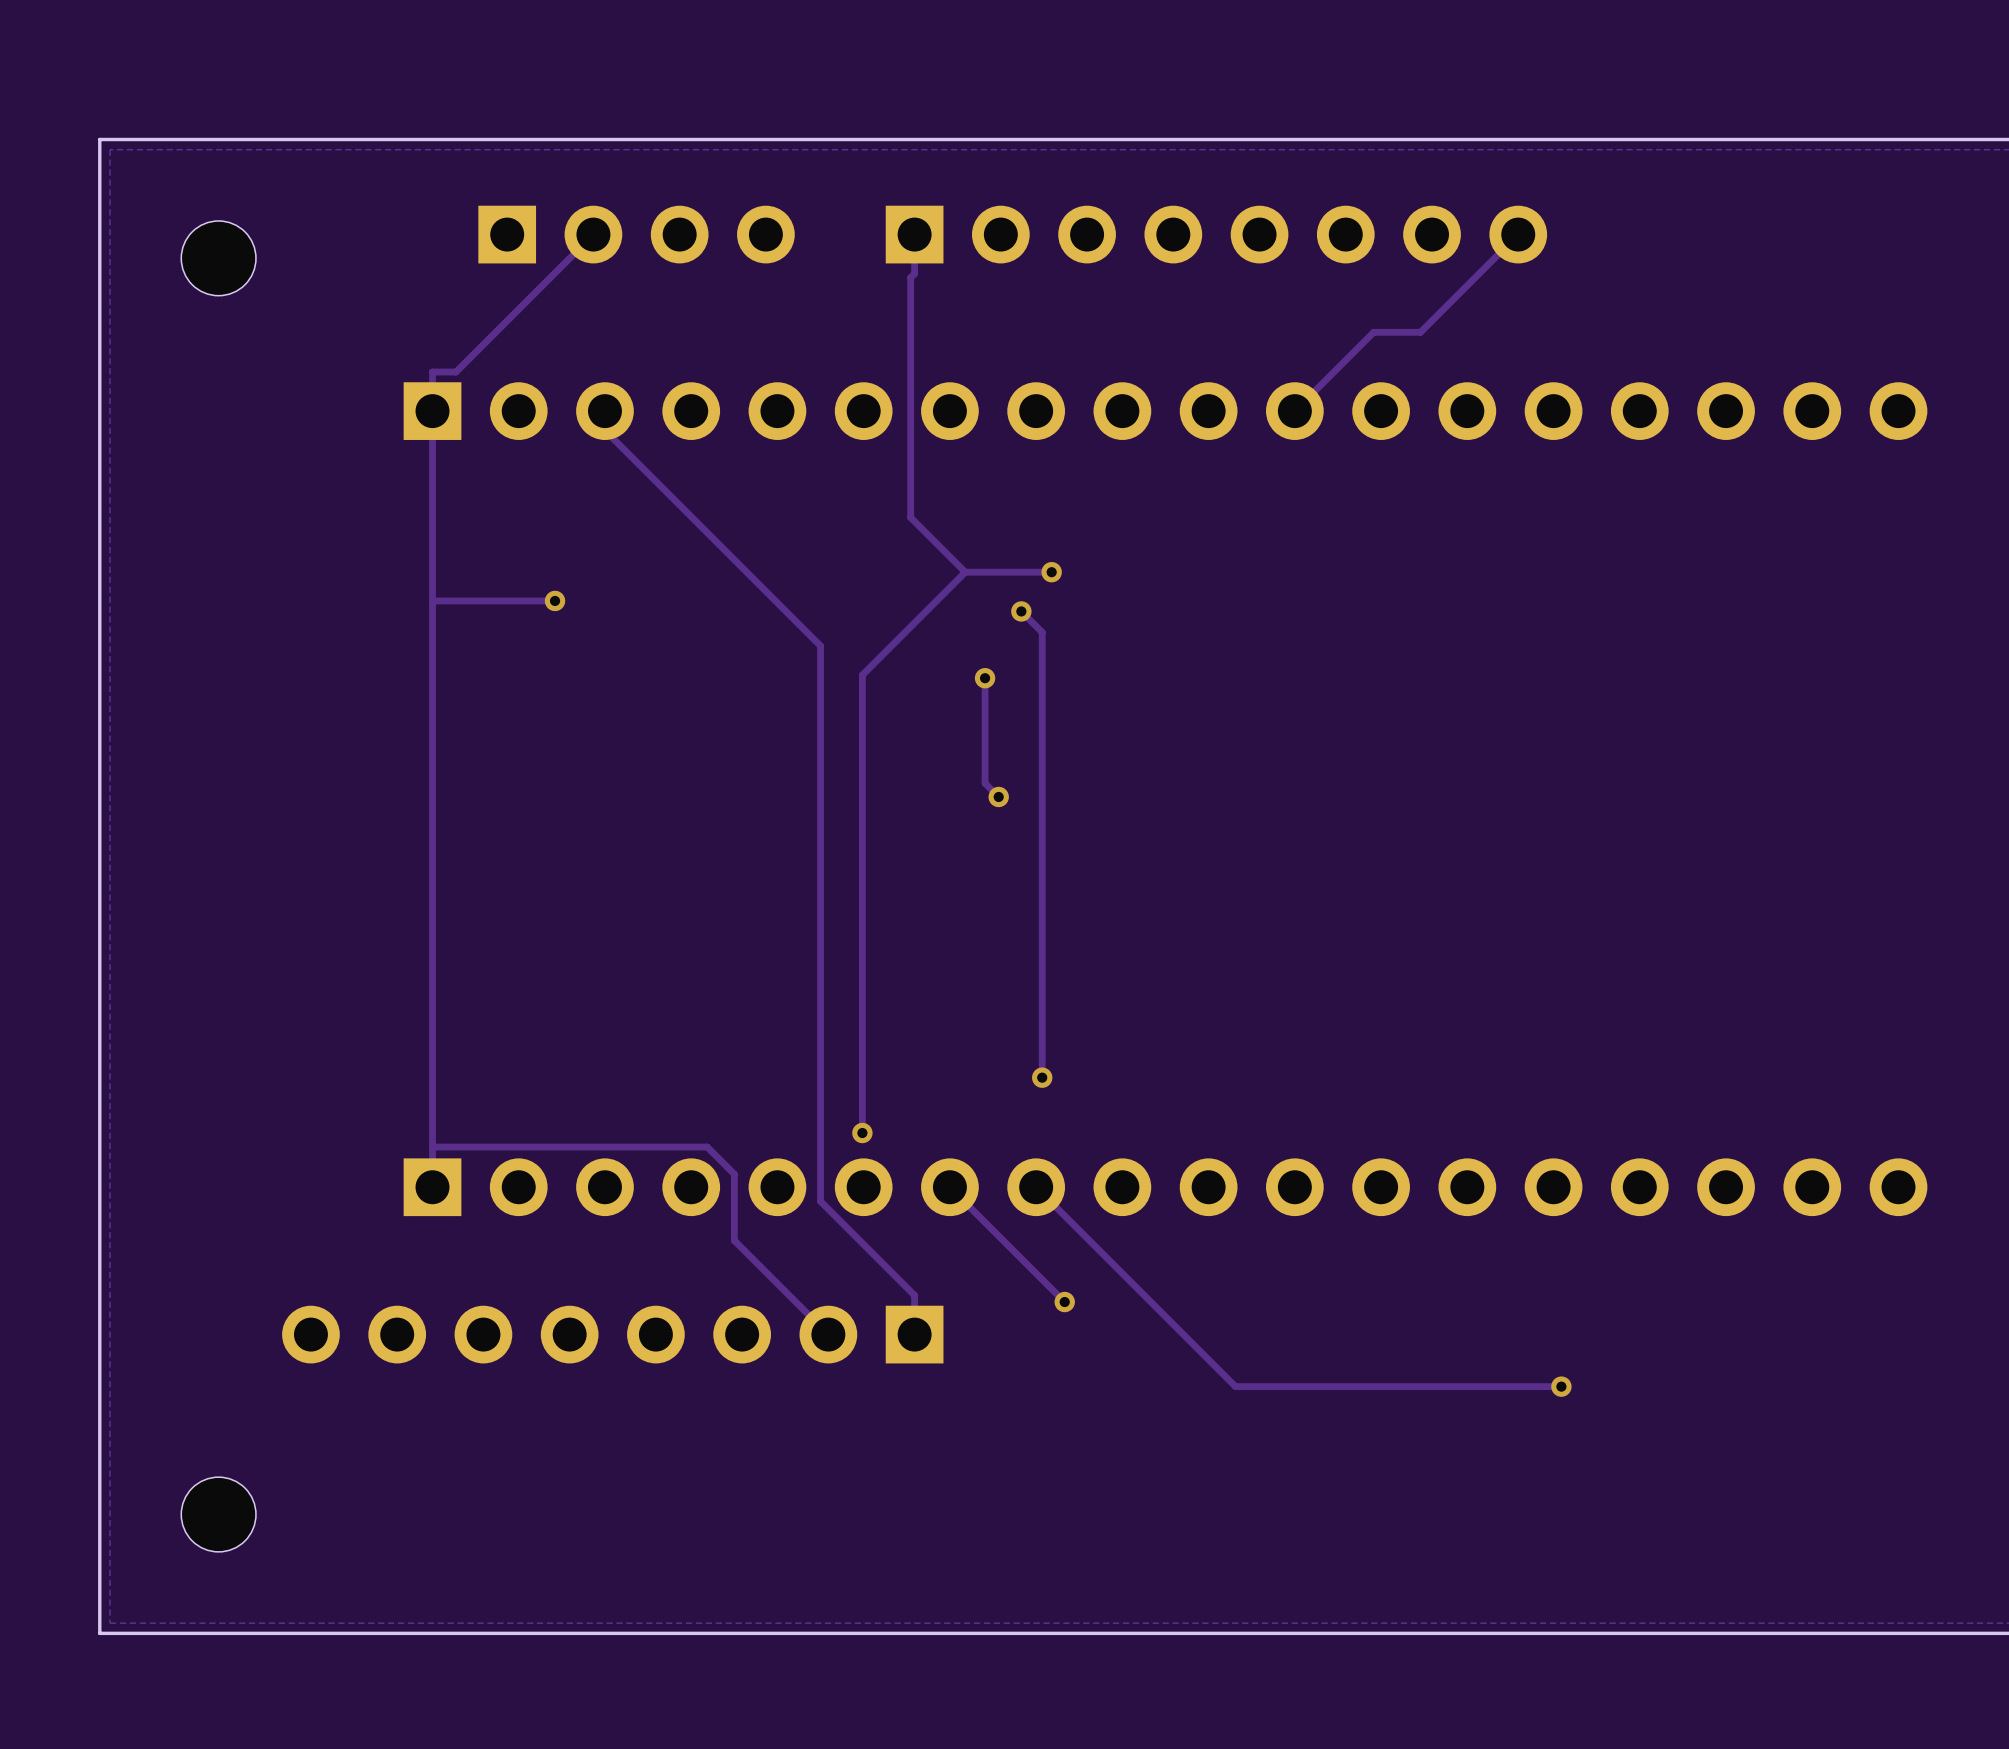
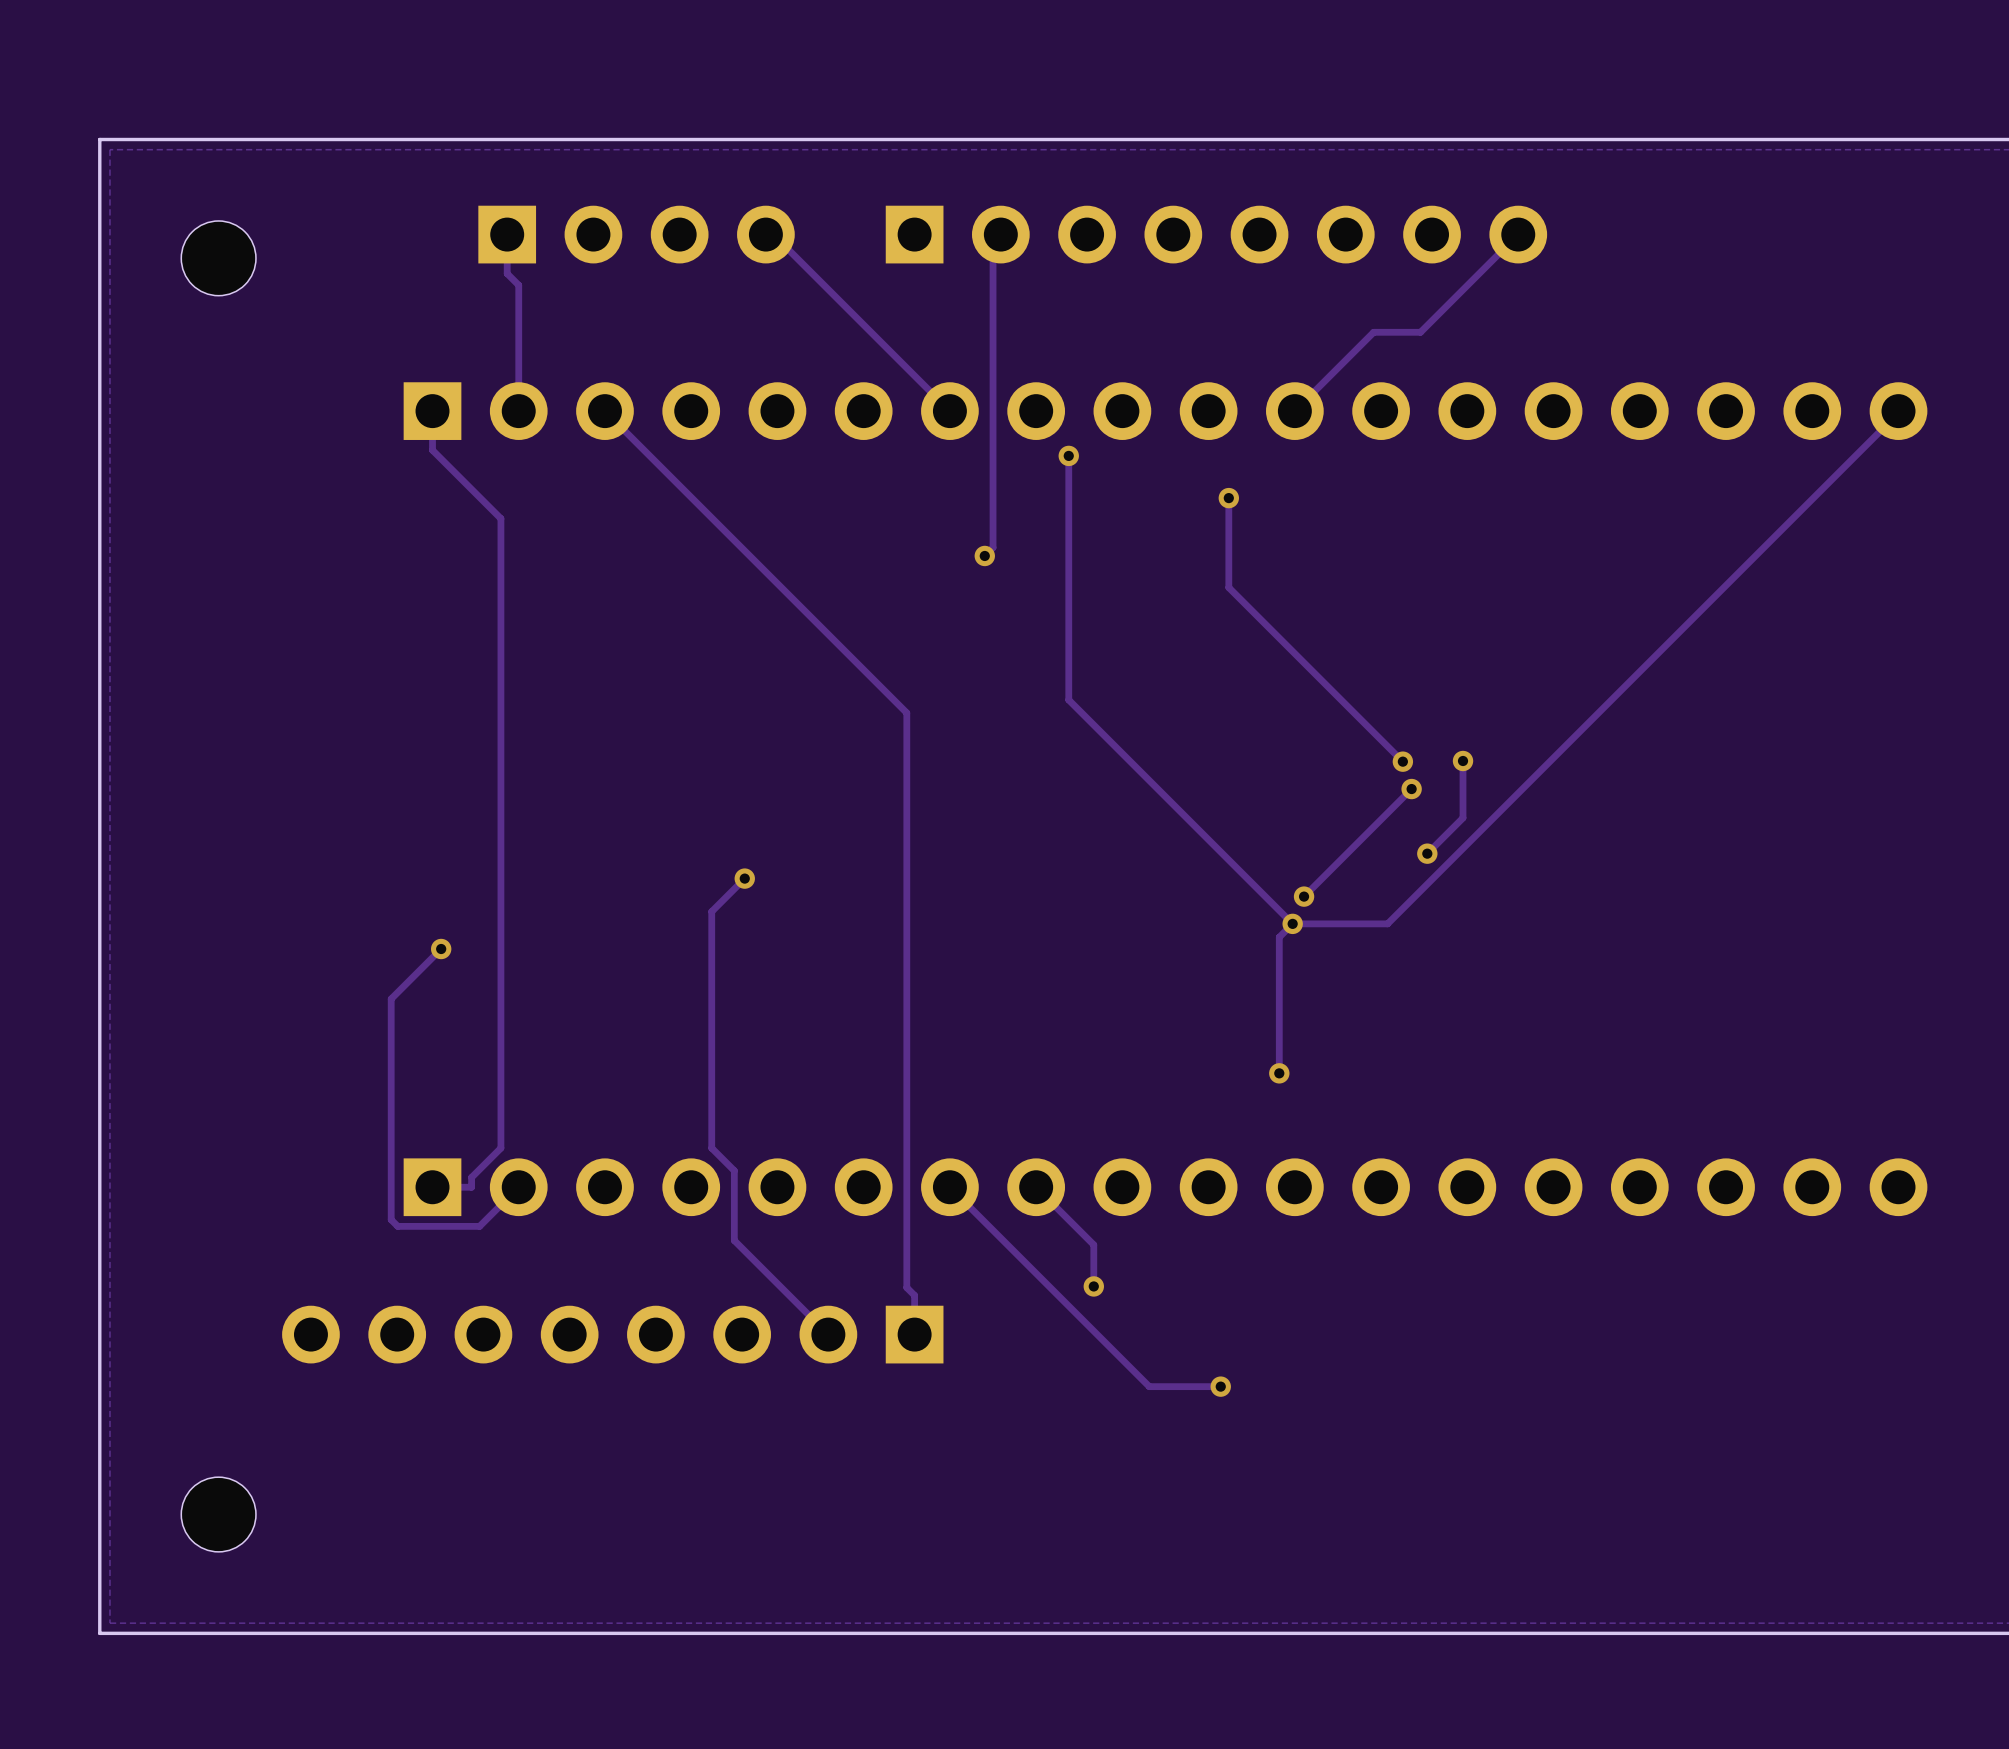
track: none -> (507, 234) (507, 273) (518, 285) (518, 411)
track: (593, 234) (455, 372) (432, 372) (432, 411) -> none
track: none -> (765, 234) (773, 234) (949, 411)
track: (914, 234) (914, 273) (910, 277) (910, 517) (965, 572) -> none
track: none -> (1000, 234) (993, 242) (993, 547) (984, 555)
track: (604, 411) (604, 430) (820, 645) (820, 1201) (906, 1287) -> (604, 411) (906, 712) (906, 1287)
track: none -> (1898, 411) (1387, 923) (1292, 923)
track: (432, 450) (432, 1187) -> (432, 450) (500, 518) (500, 1148) (471, 1177) (471, 1187) (432, 1187)
track: none -> (1068, 455) (1068, 699) (1292, 923)
via: none -> (1068, 455)
track: none -> (1228, 498) (1228, 587) (1402, 761)
via: none -> (1228, 498)
via: none -> (984, 555)
track: (965, 572) (862, 675) (862, 1133) -> none
track: (1051, 572) (965, 572) -> none
via: (1051, 572) -> none
track: (555, 600) (432, 600) -> none
via: (555, 600) -> none
track: (1021, 611) (1042, 632) (1042, 1077) -> none
via: (1021, 611) -> none
track: (985, 678) (985, 783) (998, 796) -> none
via: (985, 678) -> none
via: none -> (1402, 761)
track: none -> (1463, 761) (1463, 817) (1427, 853)
via: none -> (1463, 761)
track: none -> (1411, 789) (1304, 896)
via: none -> (1411, 789)
via: (998, 796) -> none
via: none -> (1427, 853)
via: none -> (744, 878)
via: none -> (1304, 896)
track: none -> (1292, 923) (1279, 937) (1279, 1073)
via: none -> (1292, 923)
track: none -> (441, 949) (391, 998) (391, 1219) (397, 1226) (479, 1226) (518, 1187)
via: none -> (441, 949)
via: none -> (1279, 1073)
via: (1042, 1077) -> none
via: (862, 1133) -> none
track: (432, 1147) (707, 1147) (734, 1174) -> (744, 878) (711, 911) (711, 1148) (734, 1170) (734, 1174)
track: (1093, 1244) (1235, 1386) (1561, 1386) -> (1093, 1244) (1093, 1286)
track: none -> (1064, 1302) (1149, 1386) (1220, 1386)
via position: (1064, 1302) -> (1093, 1286)
via: none -> (1220, 1386)
via: (1561, 1386) -> none

